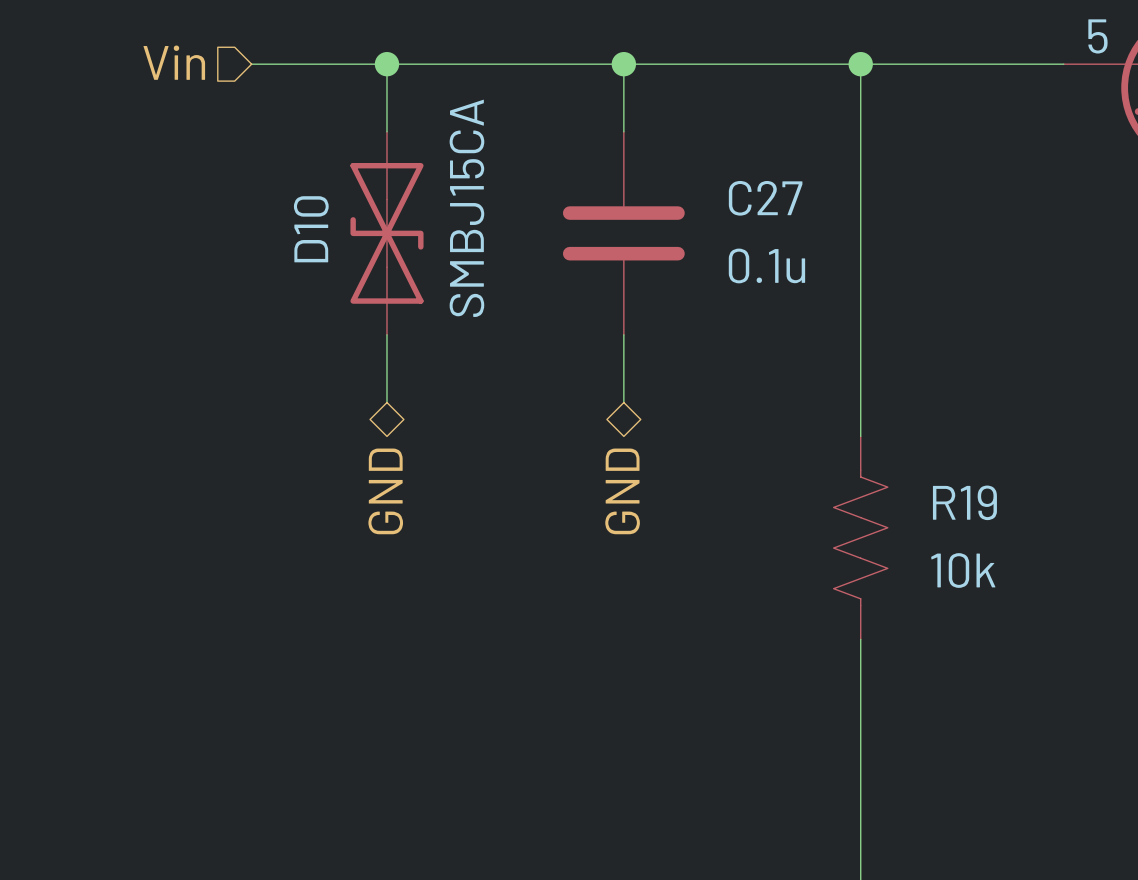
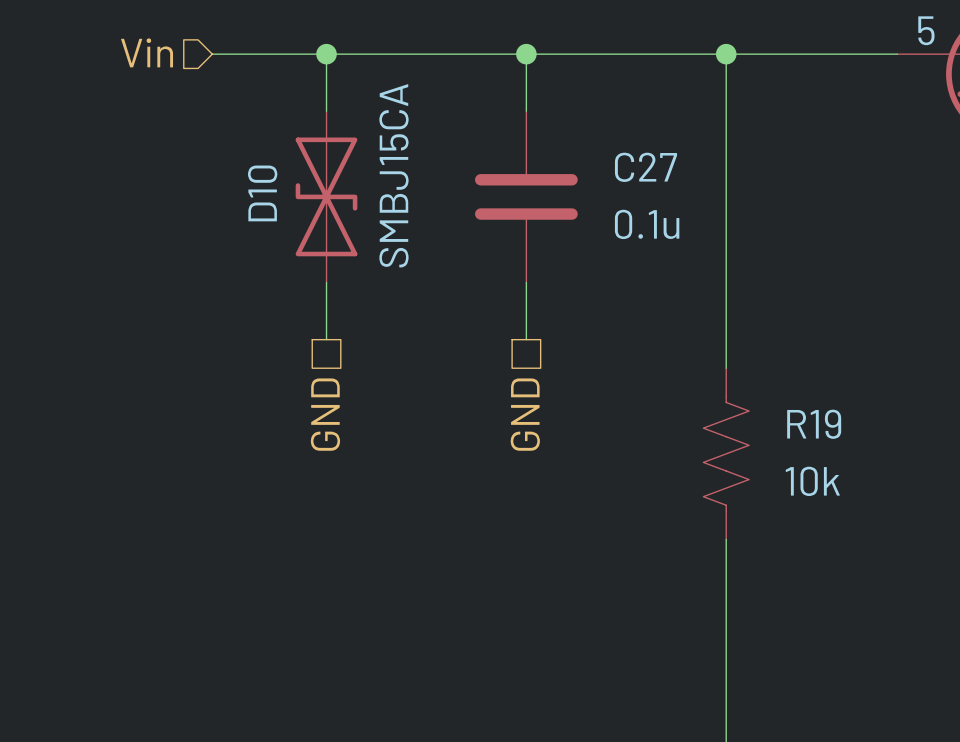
hierarchical label shape: bidirectional (385, 491) -> passive (325, 414)
hierarchical label shape: bidirectional (622, 491) -> passive (525, 414)

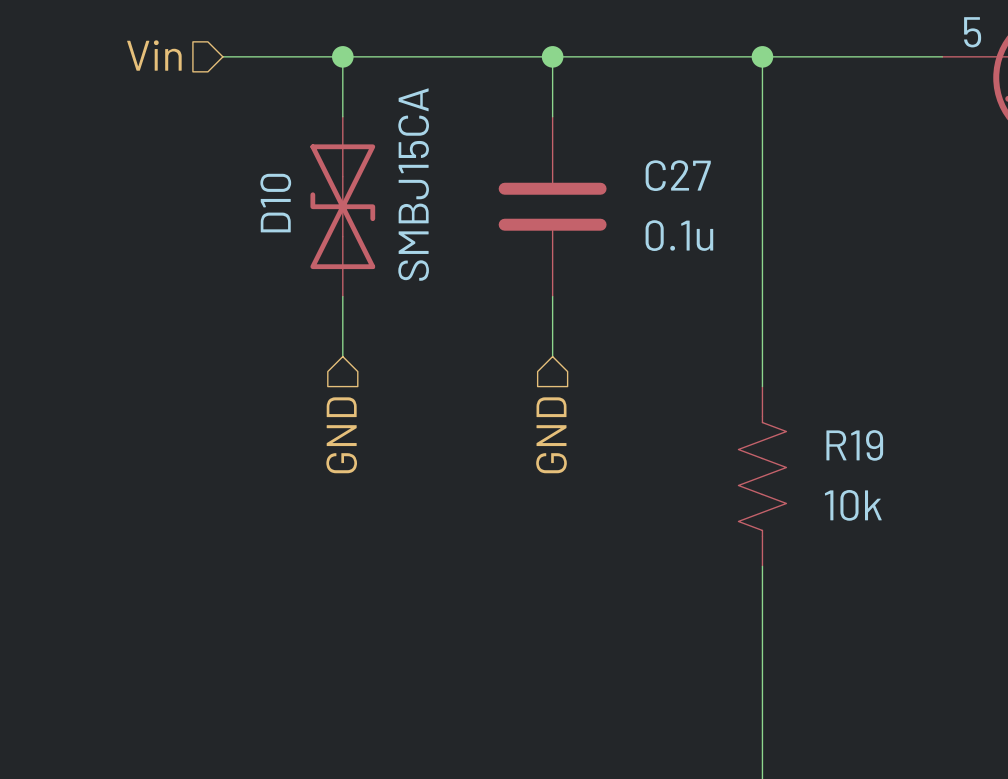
hierarchical label shape: passive (325, 414) -> input (341, 435)
hierarchical label shape: passive (525, 414) -> input (551, 435)

